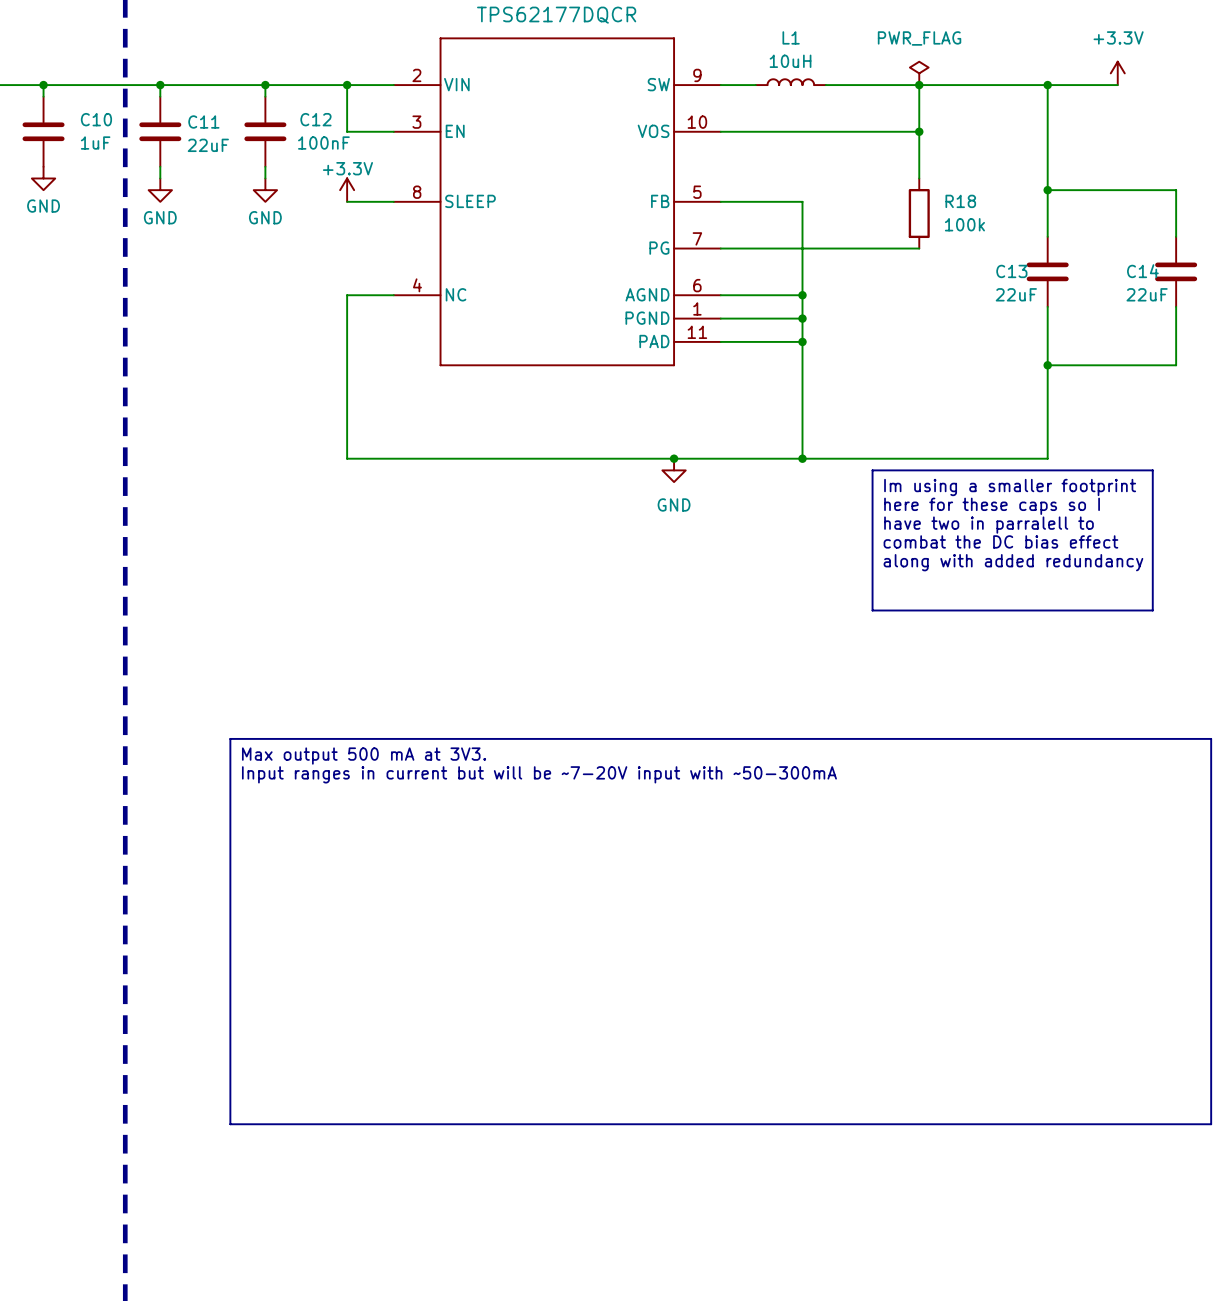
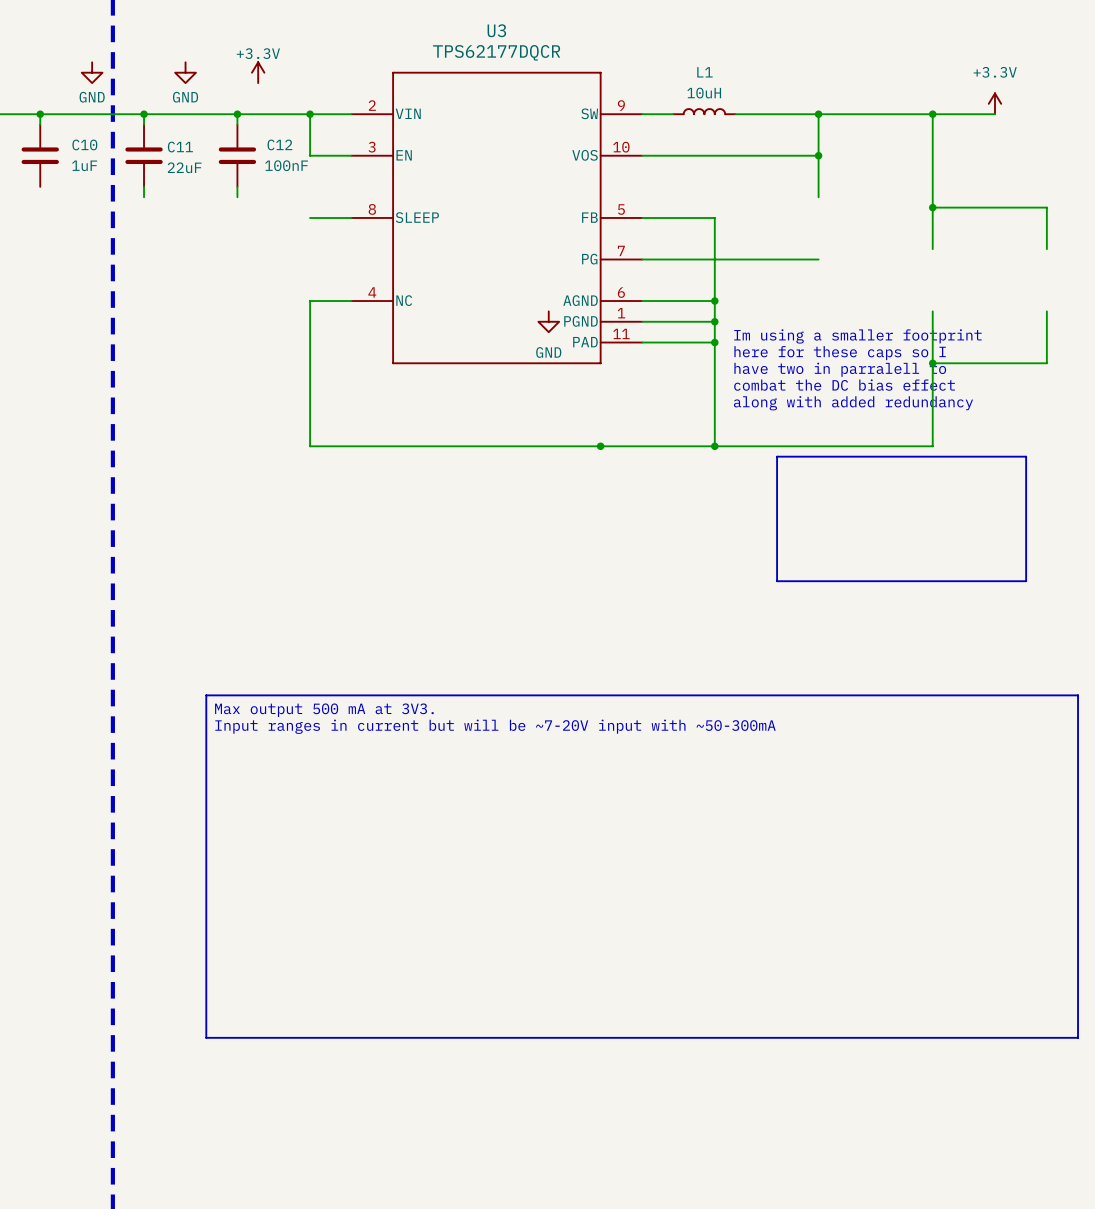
power symbol: none -> GND (92, 72)
power symbol: none -> GND (185, 72)
power symbol: PWR_FLAG (919, 73) -> none
power symbol: GND (43, 178) -> none
power symbol: GND (160, 190) -> none
power symbol: GND (265, 190) -> none
power symbol position: +3.3V (347, 190) -> +3.3V (258, 72)
R18: 100k (919, 213) -> none
C13: 22uF (1047, 271) -> none
C14: 22uF (1176, 271) -> none
power symbol position: GND (674, 470) -> GND (548, 321)
text position: Im using a smaller footprint (1010, 487) -> Im using a smaller footprint (857, 336)
text position: here for these caps so I (992, 506) -> here for these caps so I (840, 353)
text position: have two in parralell to (988, 525) -> have two in parralell to (840, 369)
text position: combat the DC bias effect (1000, 541) -> combat the DC bias effect (844, 385)
text position: along with added redundancy (1013, 562) -> along with added redundancy (853, 403)

